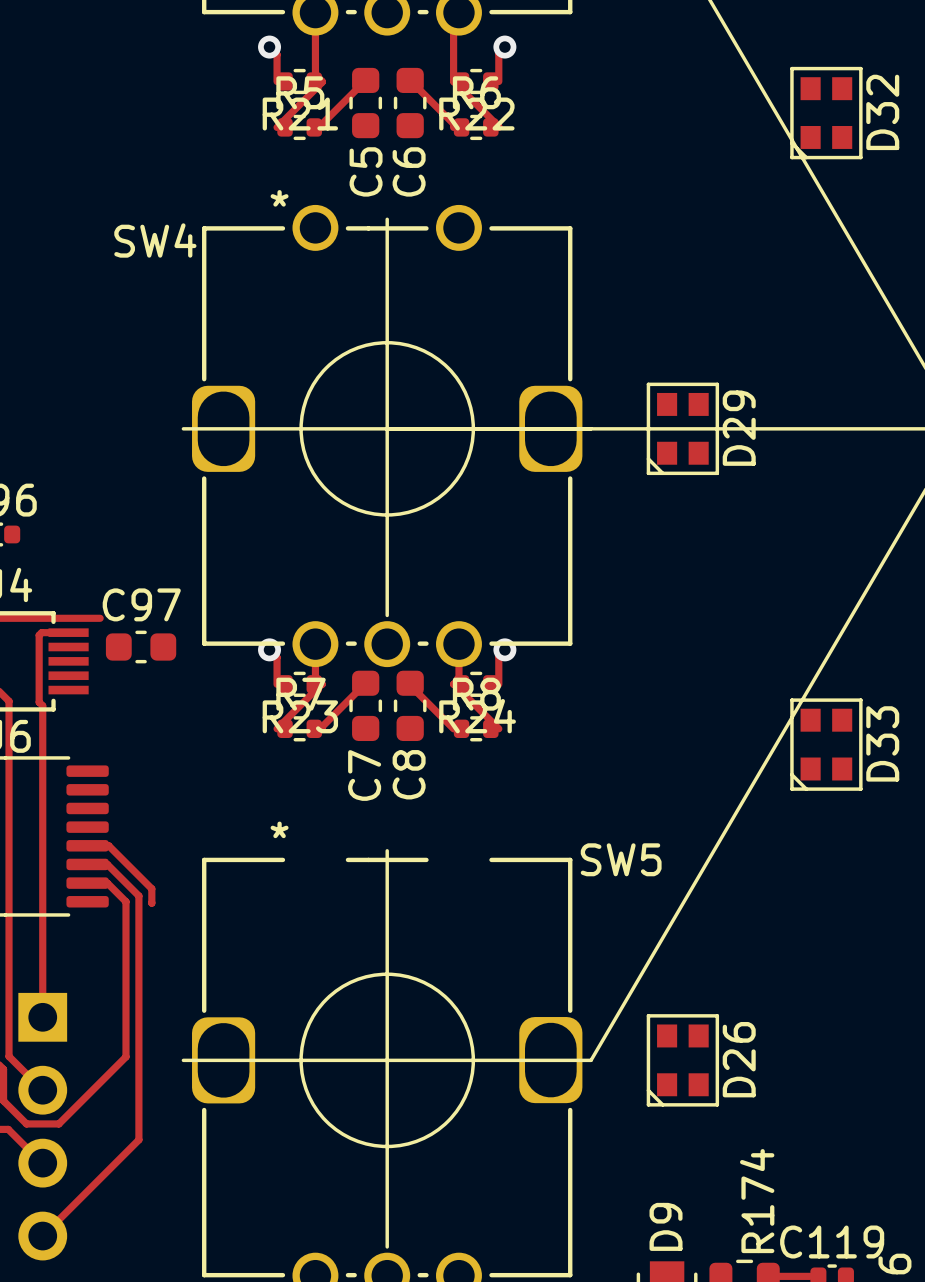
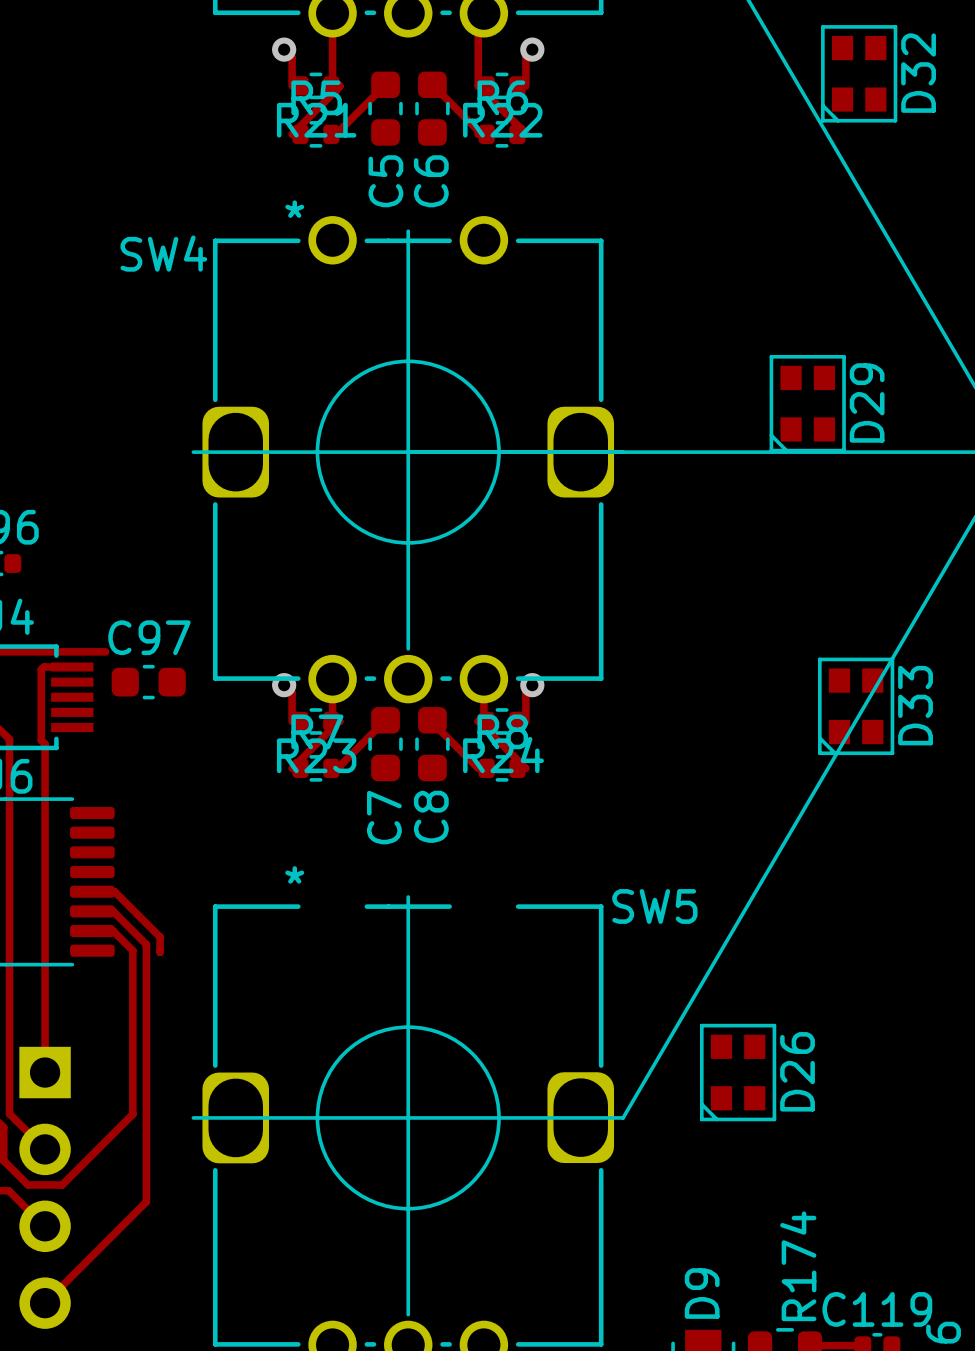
D32 position: (826, 113) -> (859, 73)
D29 position: (682, 428) -> (807, 403)
D33 position: (826, 744) -> (856, 706)
D26 position: (682, 1060) -> (738, 1072)

